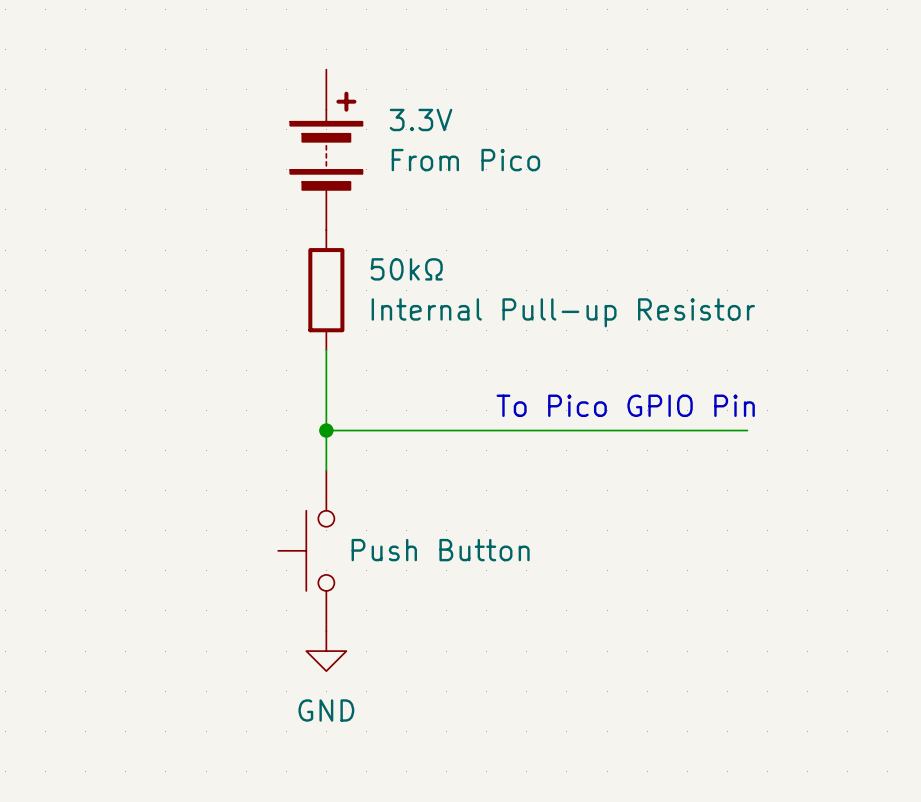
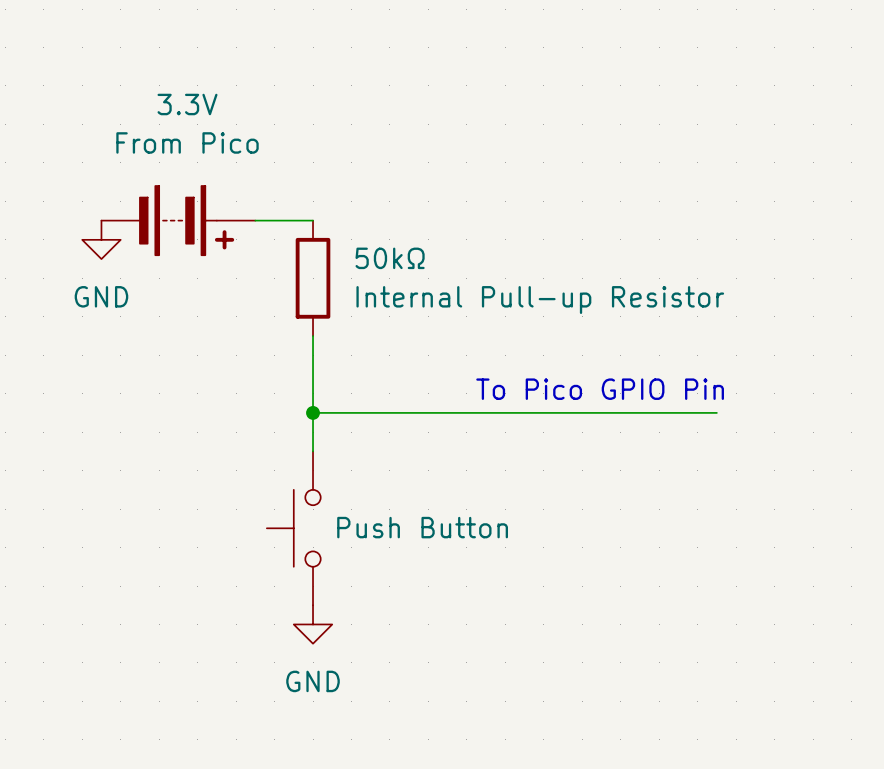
3.3V name position: 3.3V (421, 119) -> 3.3V (187, 104)
3.3V rotation: 0° (326, 140) -> 90° clockwise (187, 220)
3.3V position: (326, 149) -> (178, 220)
3.3V value position: From Pico (465, 160) -> From Pico (187, 142)
wire: none -> (255, 220) (313, 220)
power symbol: none -> GND (101, 239)

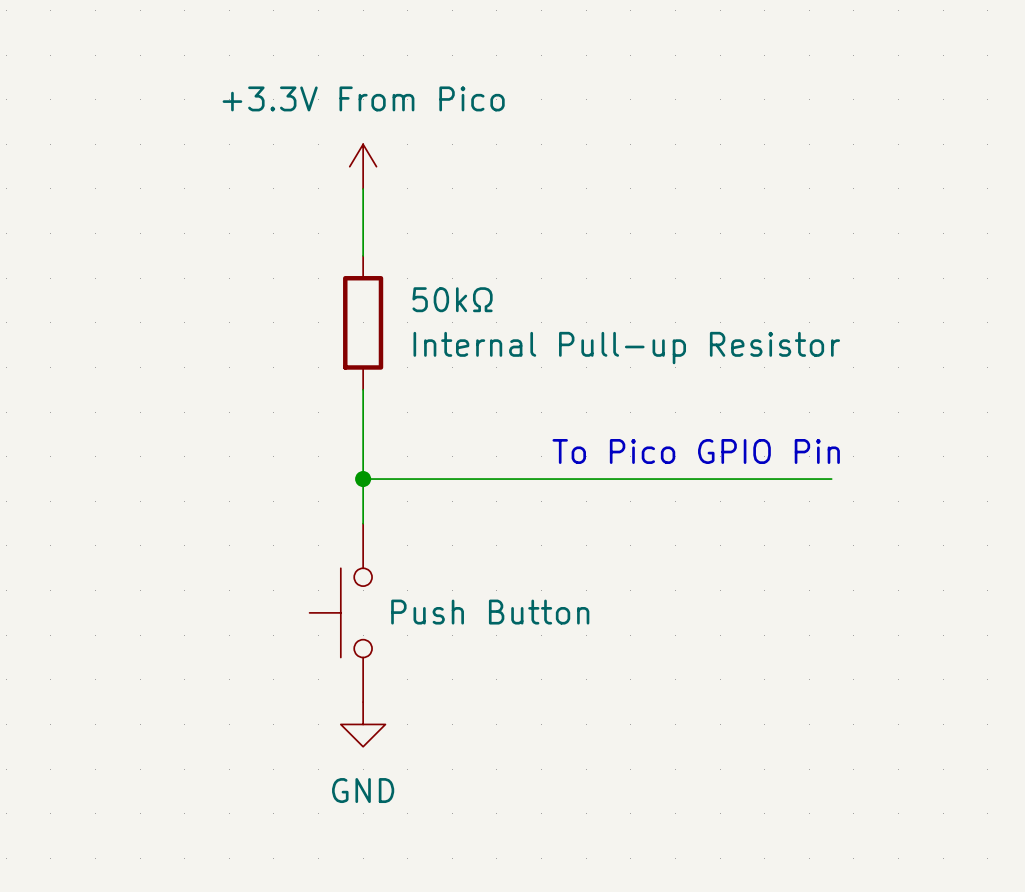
power symbol: none -> +3.3V From Pico (363, 166)
3.3V: From Pico (178, 220) -> none
wire: (255, 220) (313, 220) -> (363, 188) (363, 255)
power symbol: GND (101, 239) -> none

